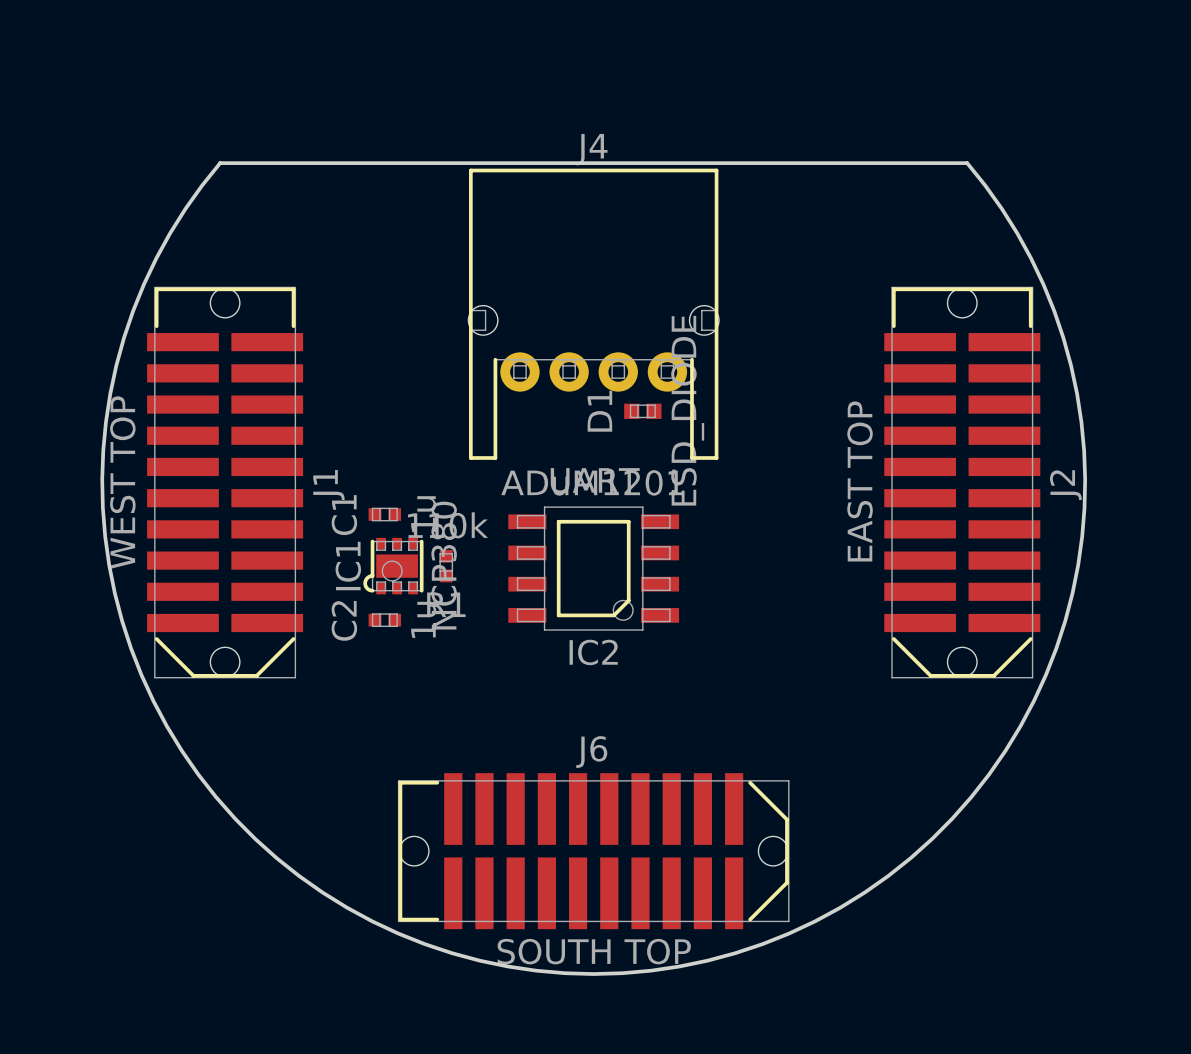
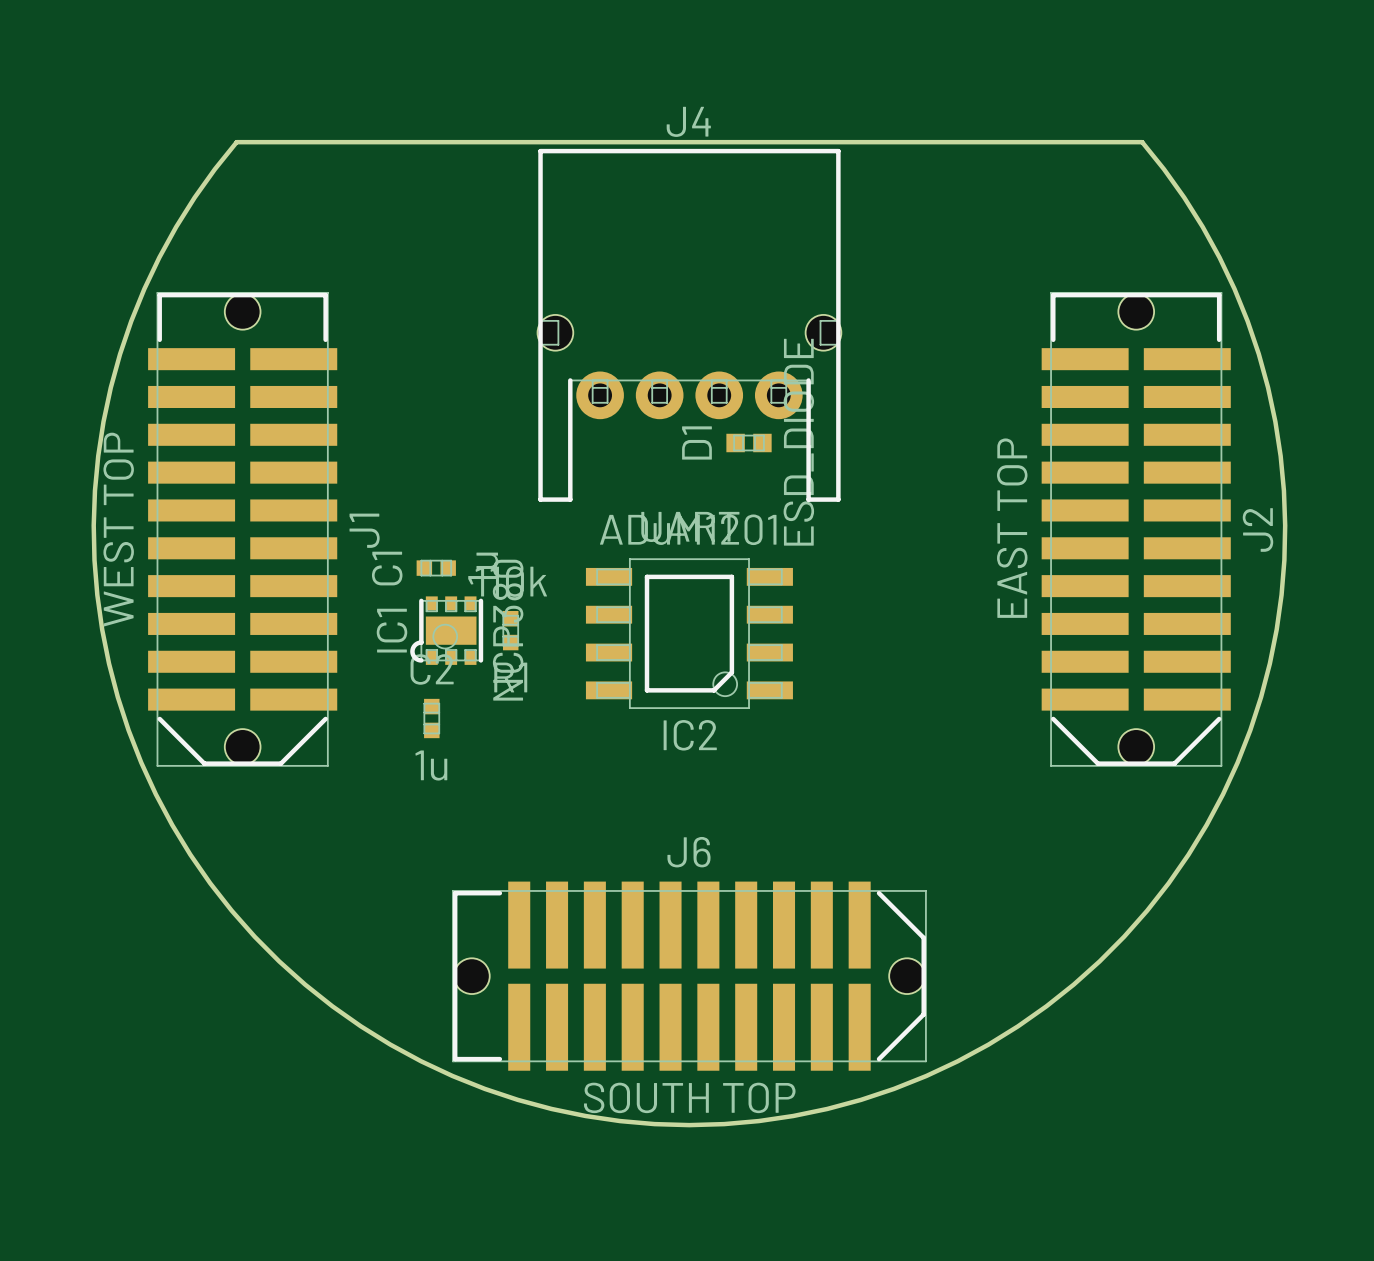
C2 rotation: 0° (384, 620) -> 90° clockwise (431, 718)

